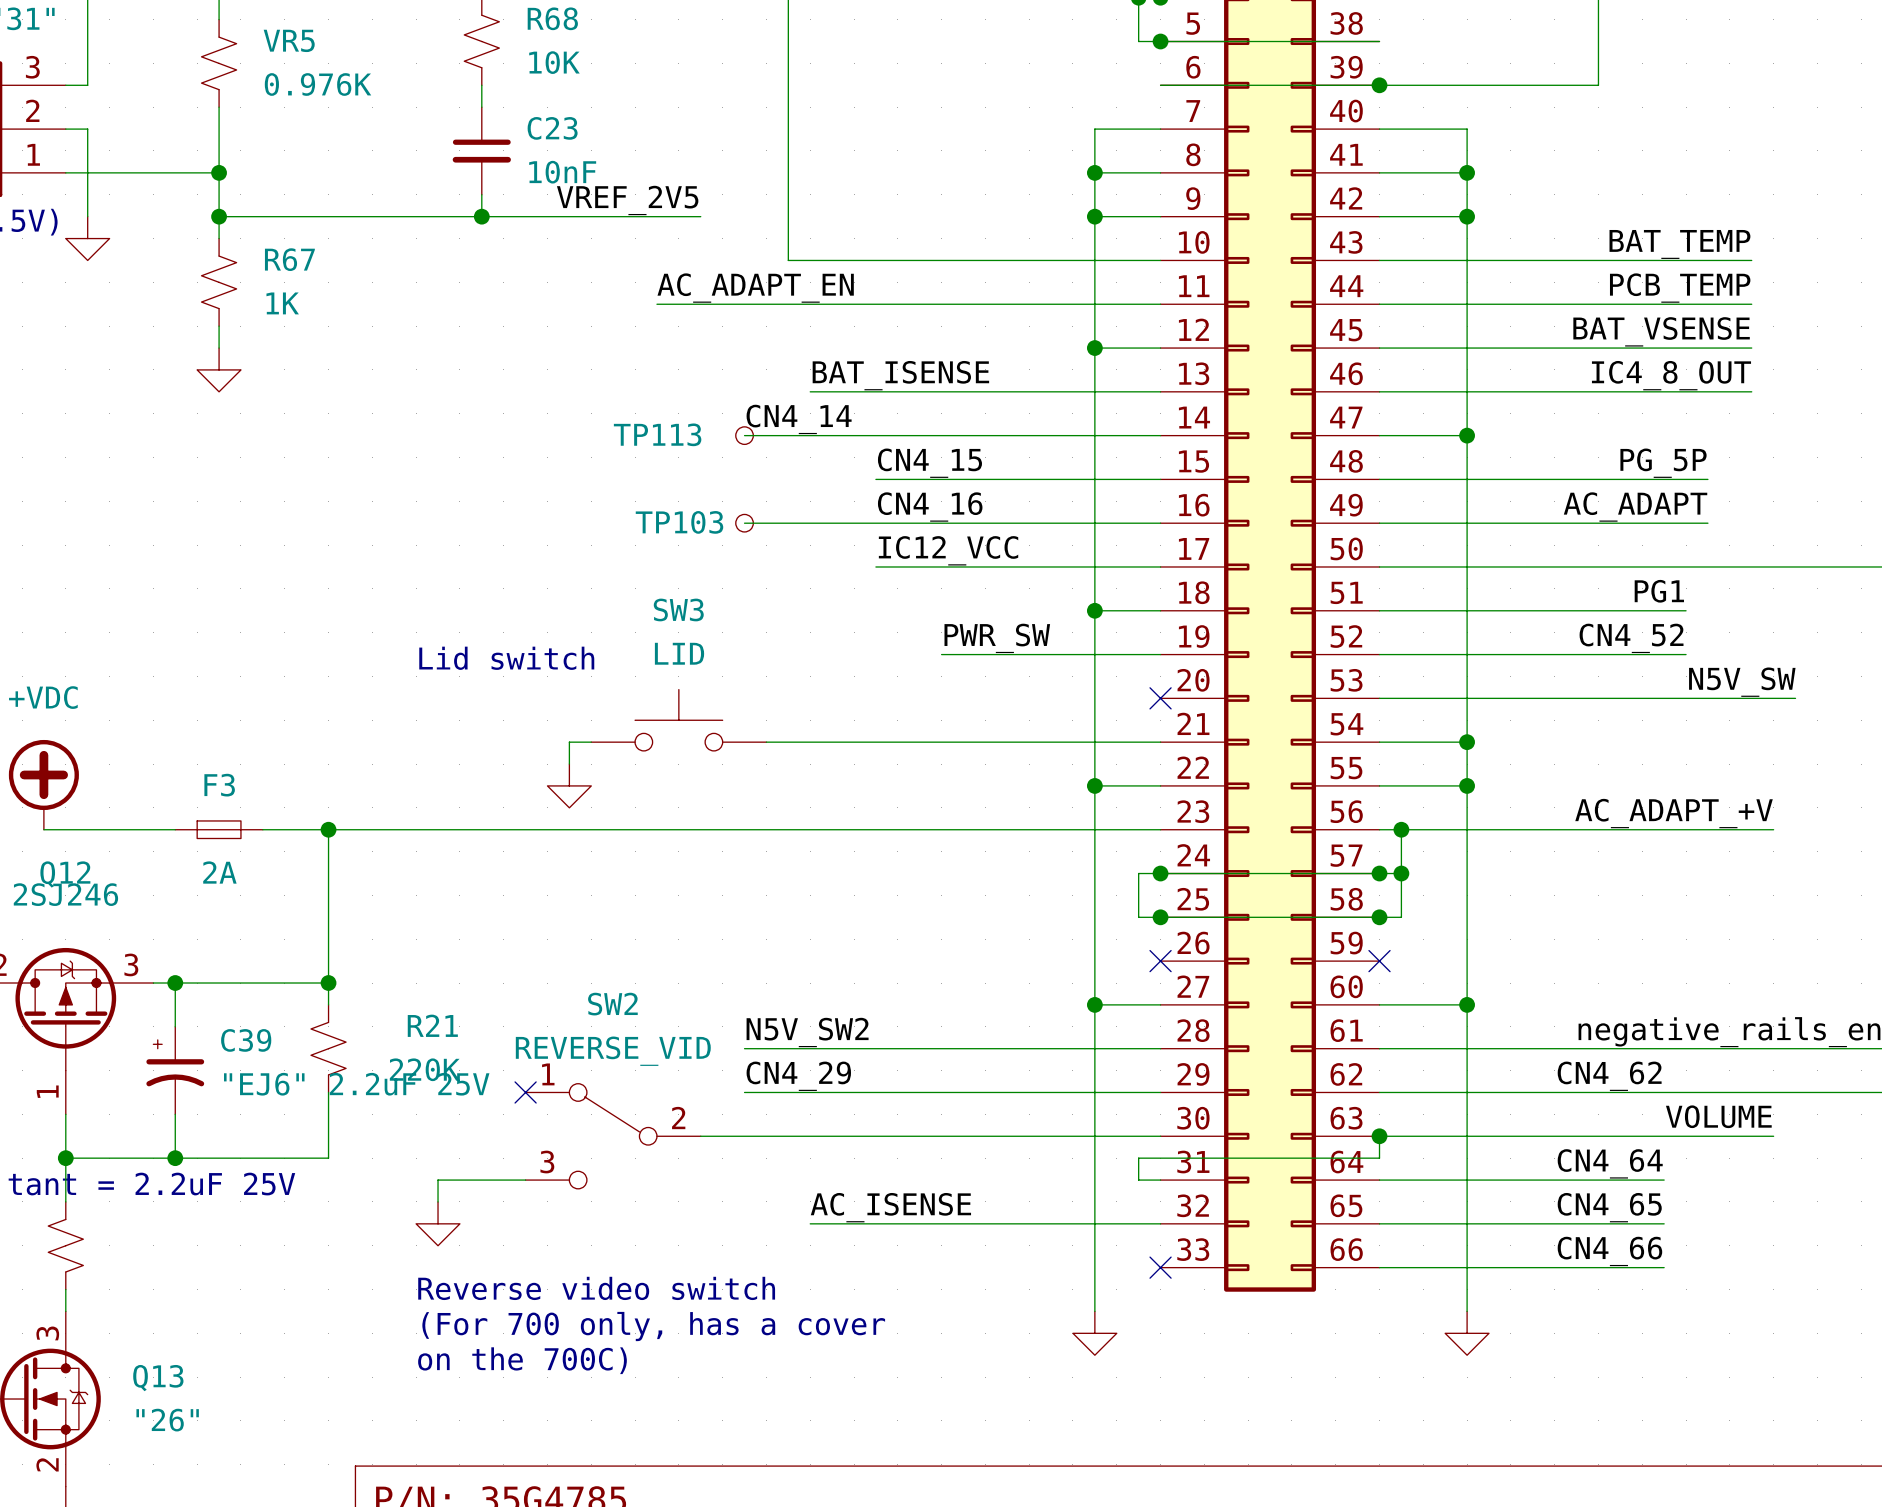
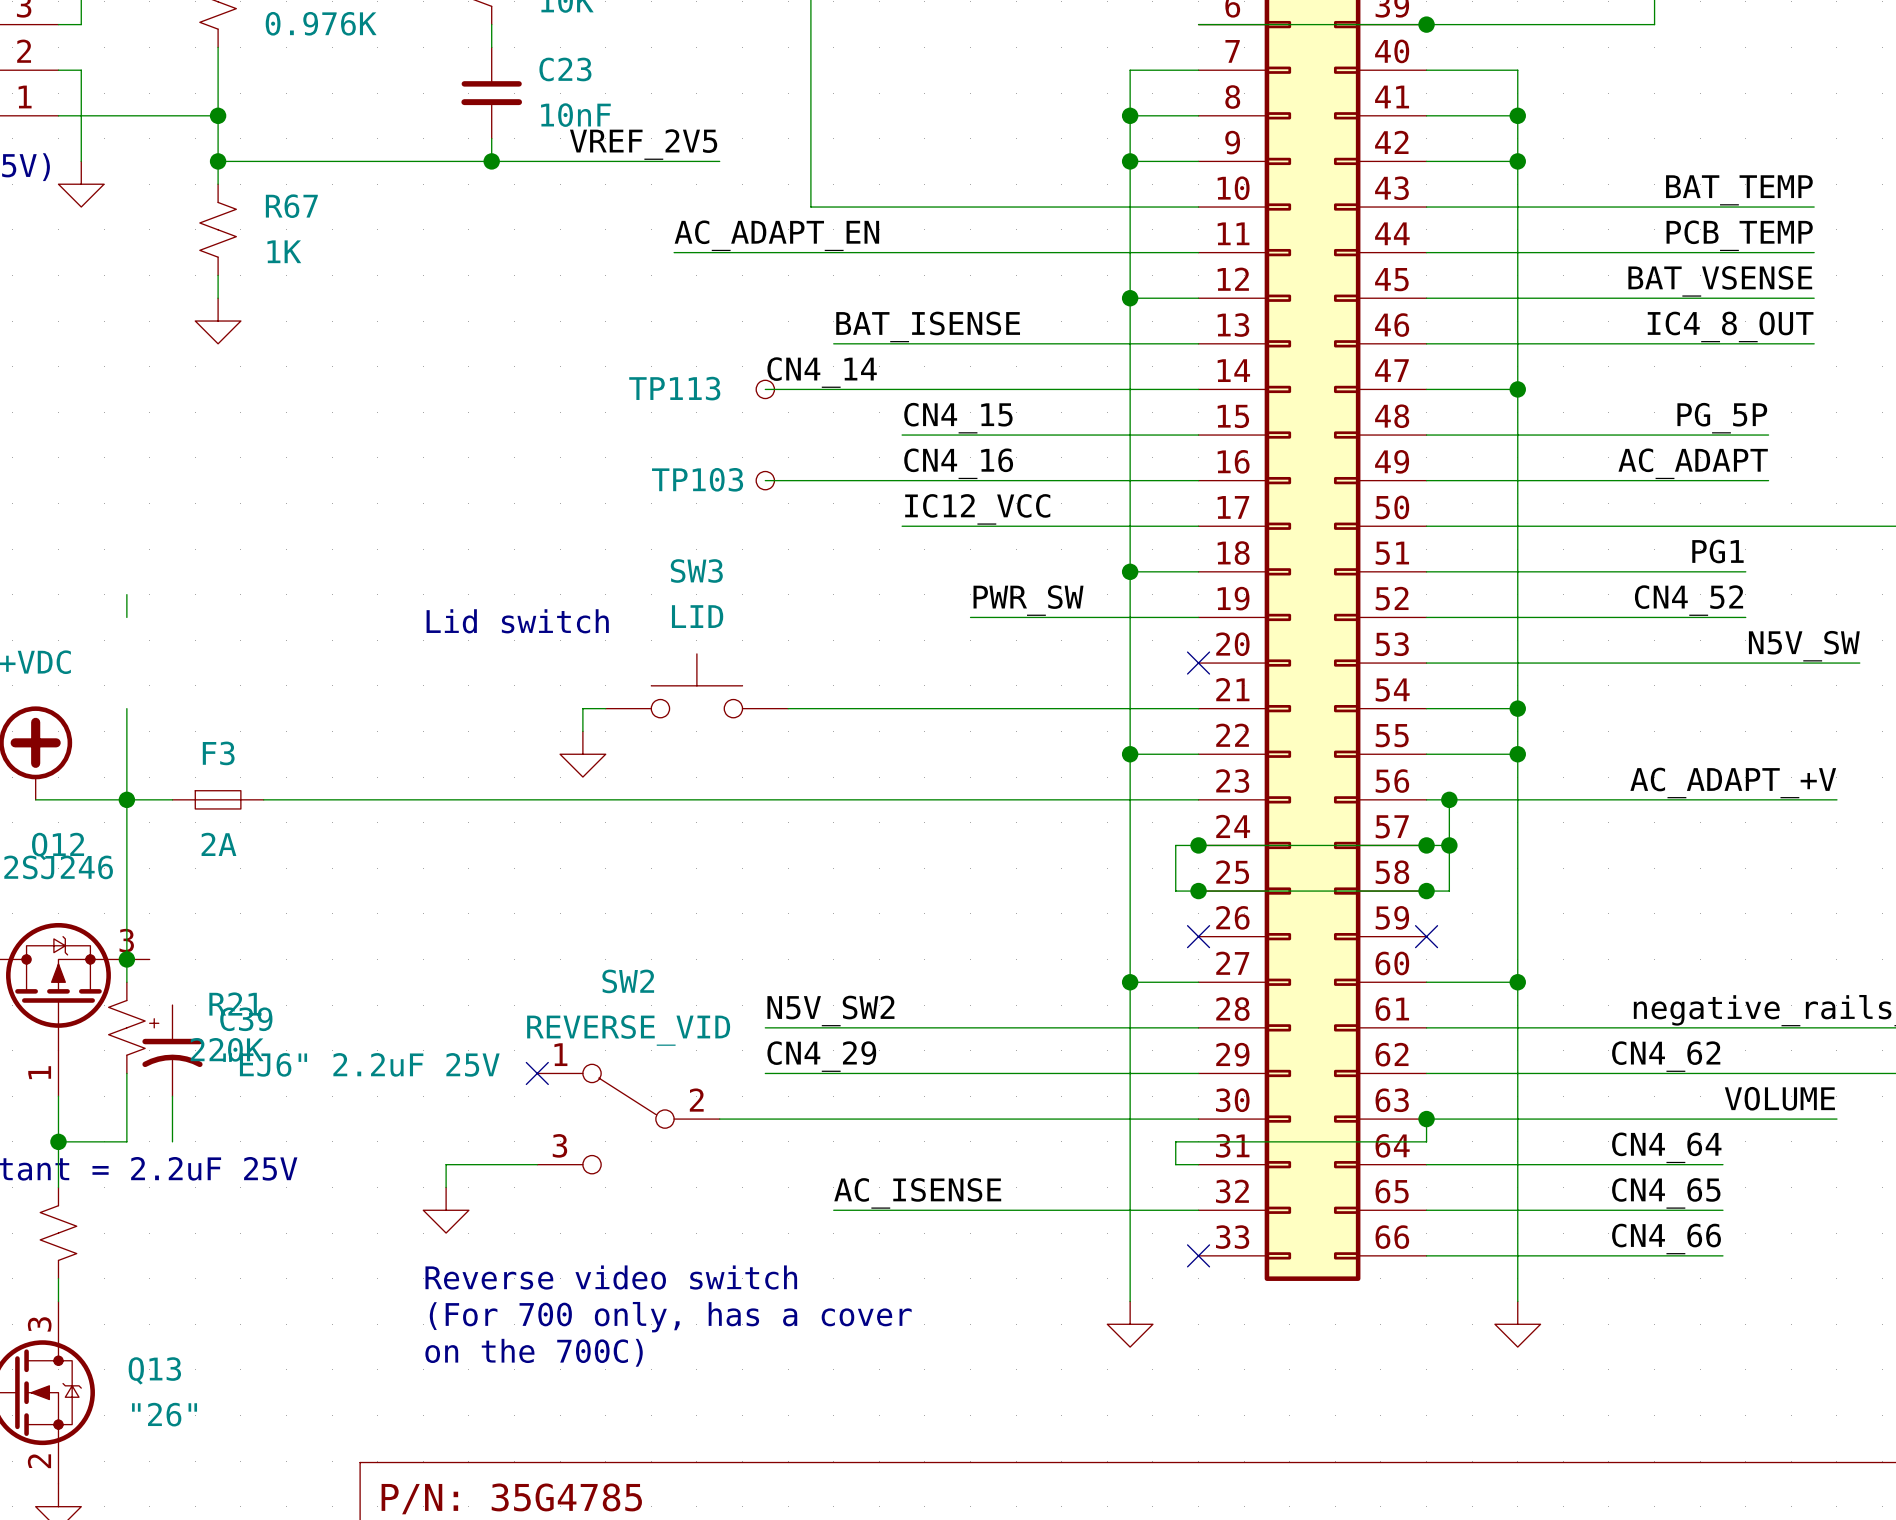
wire: none -> (126, 594) (126, 617)
wire: none -> (126, 708) (126, 982)
junction: none -> (126, 799)
wire: (328, 829) (328, 1004) -> none
junction: (328, 829) -> none
wire: (153, 983) (328, 983) -> none
wire: (175, 983) (175, 1026) -> none
junction position: (175, 983) -> (126, 959)
junction: (328, 983) -> none
R21 position: (328, 1048) -> (126, 1027)
wire: (328, 1092) (328, 1158) (131, 1158) -> (126, 1073) (126, 1141)
junction: (175, 1158) -> none

